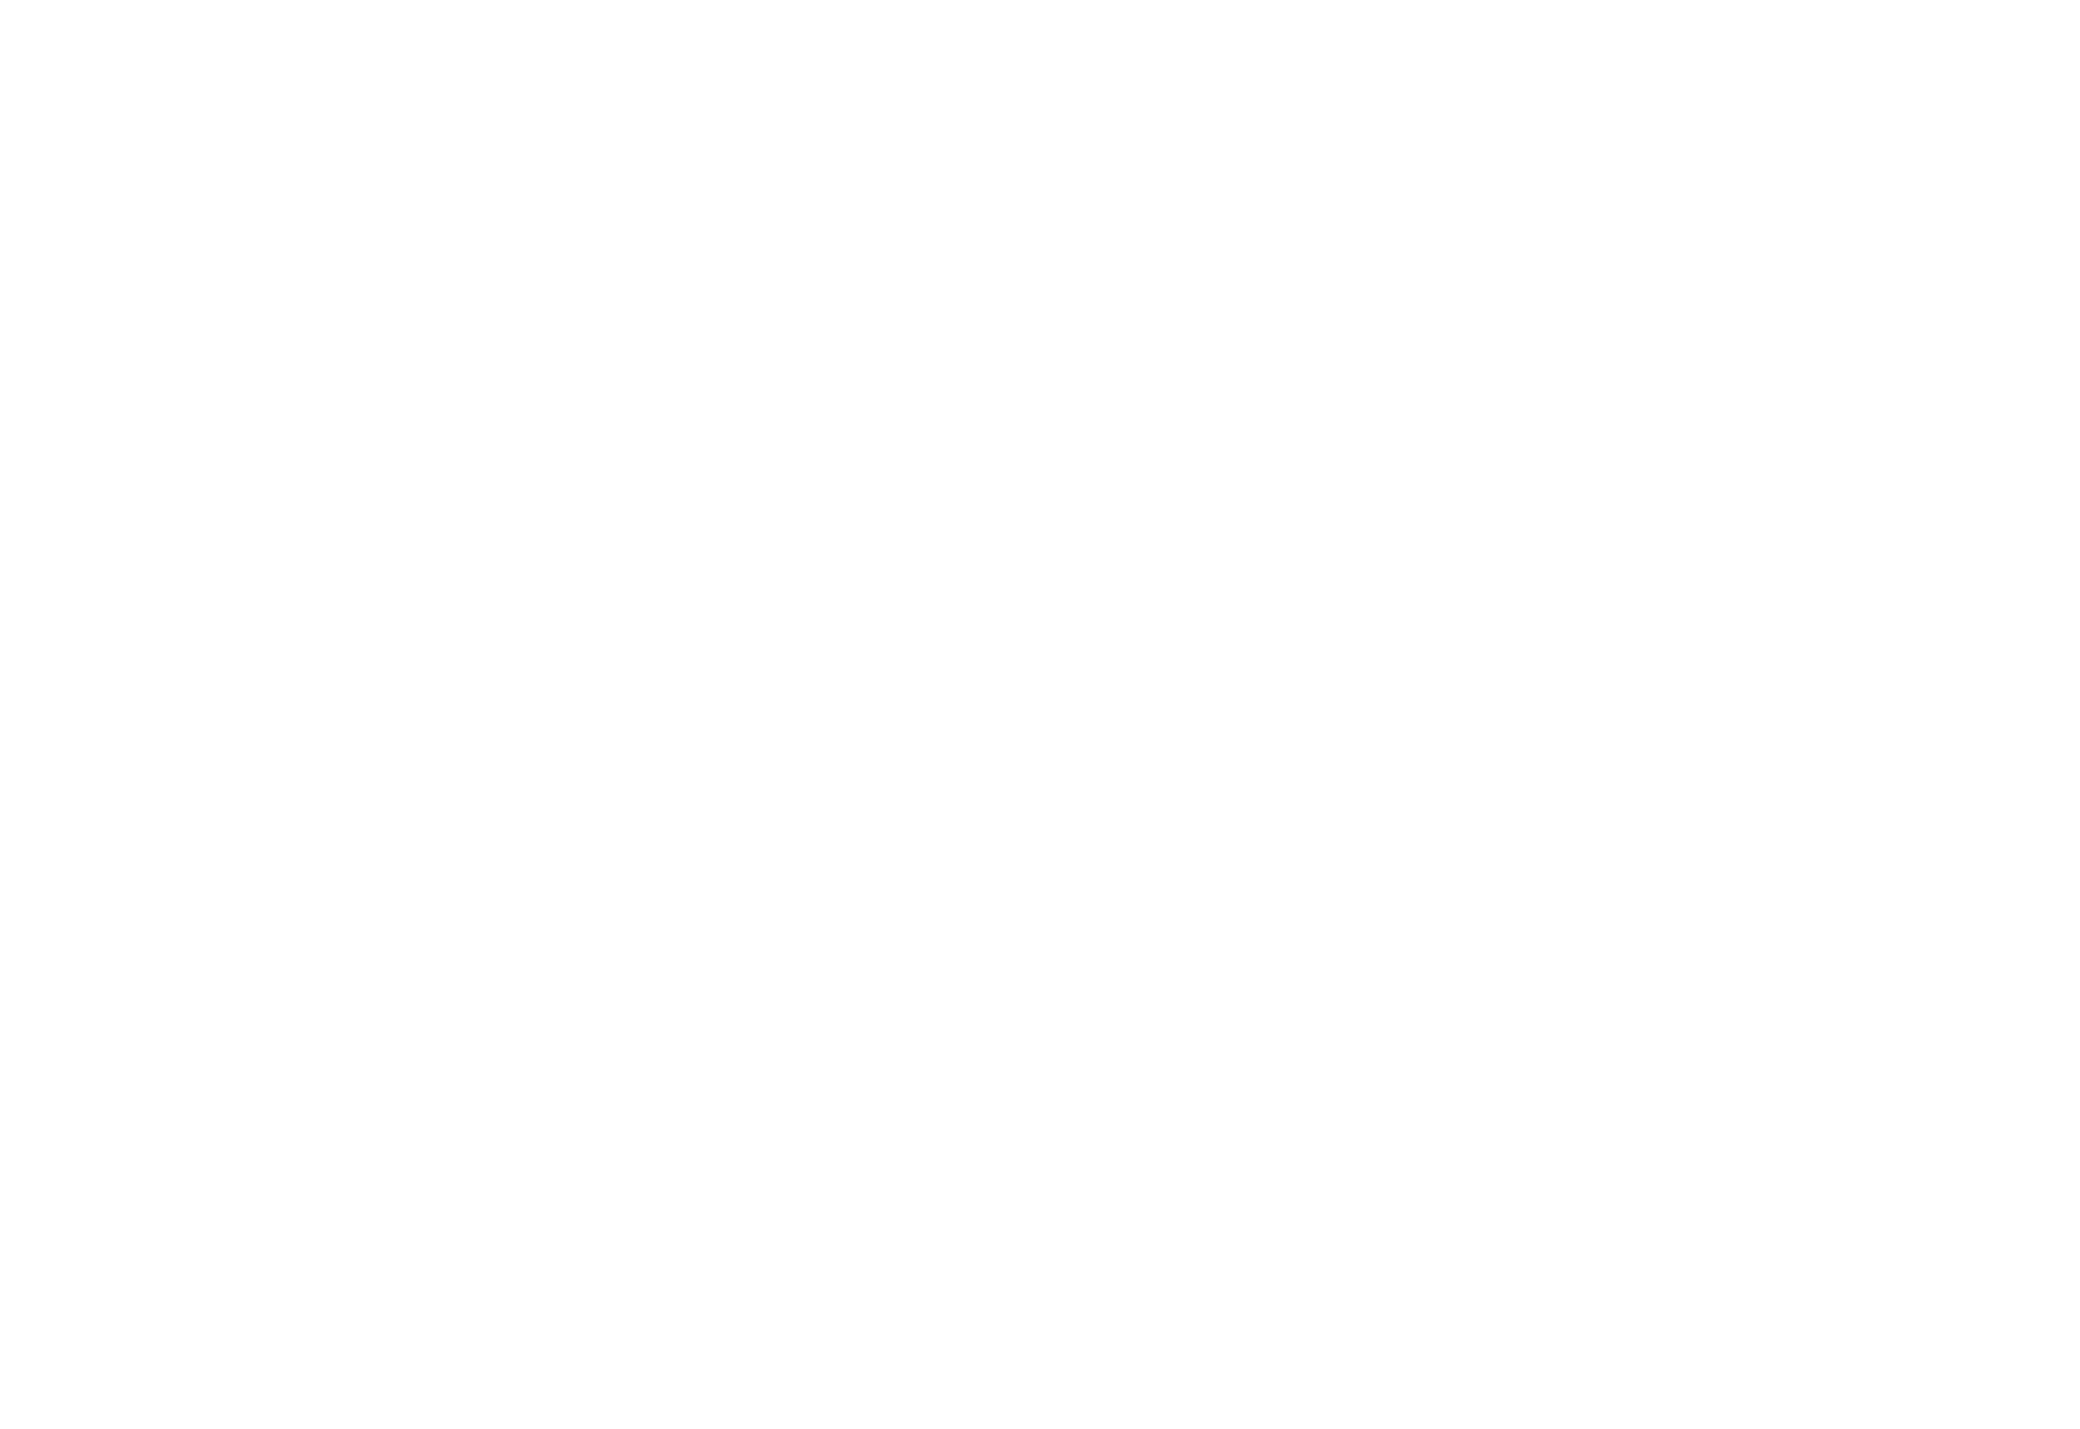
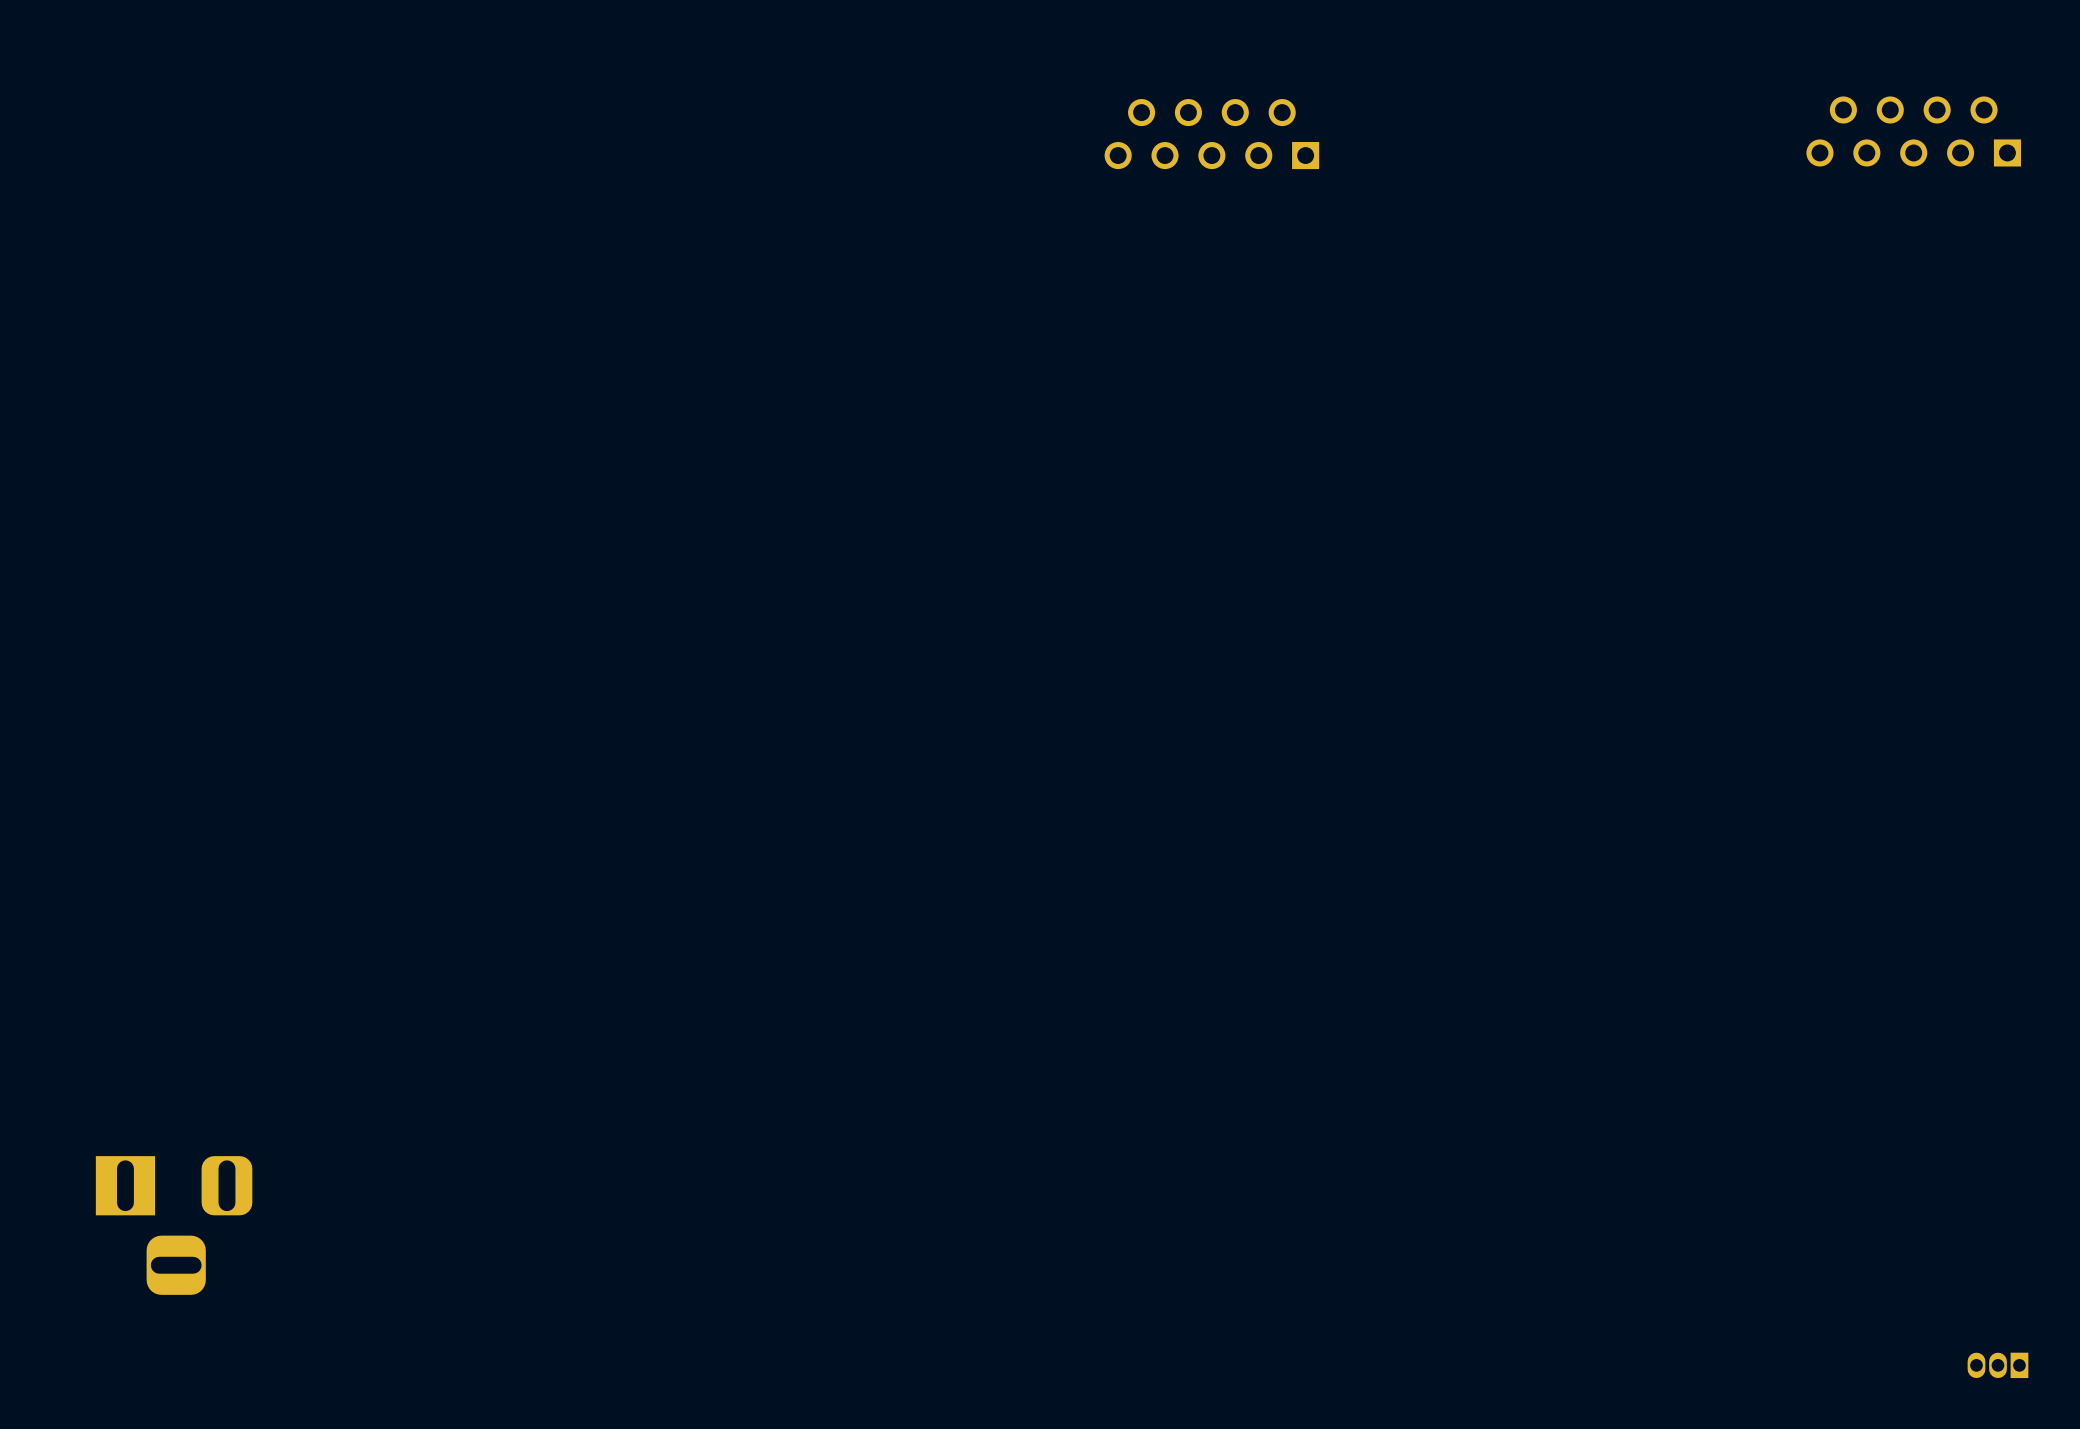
part: none -> (1913, 131)
part: none -> (1211, 134)
part: none -> (174, 1225)
part: none -> (1997, 1365)

